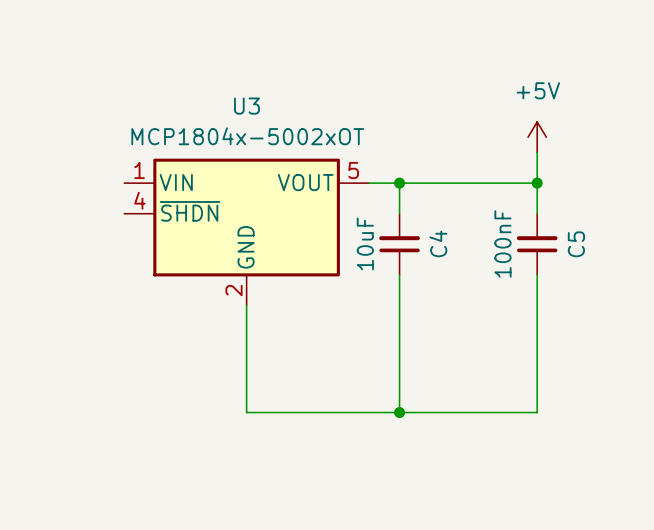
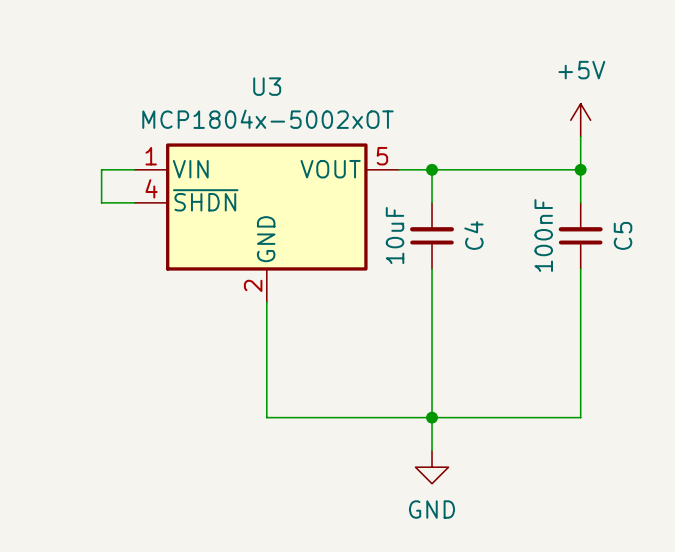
wire: none -> (134, 169) (101, 169) (101, 202) (134, 202)
wire: none -> (432, 417) (432, 450)
power symbol: none -> GND (432, 467)

